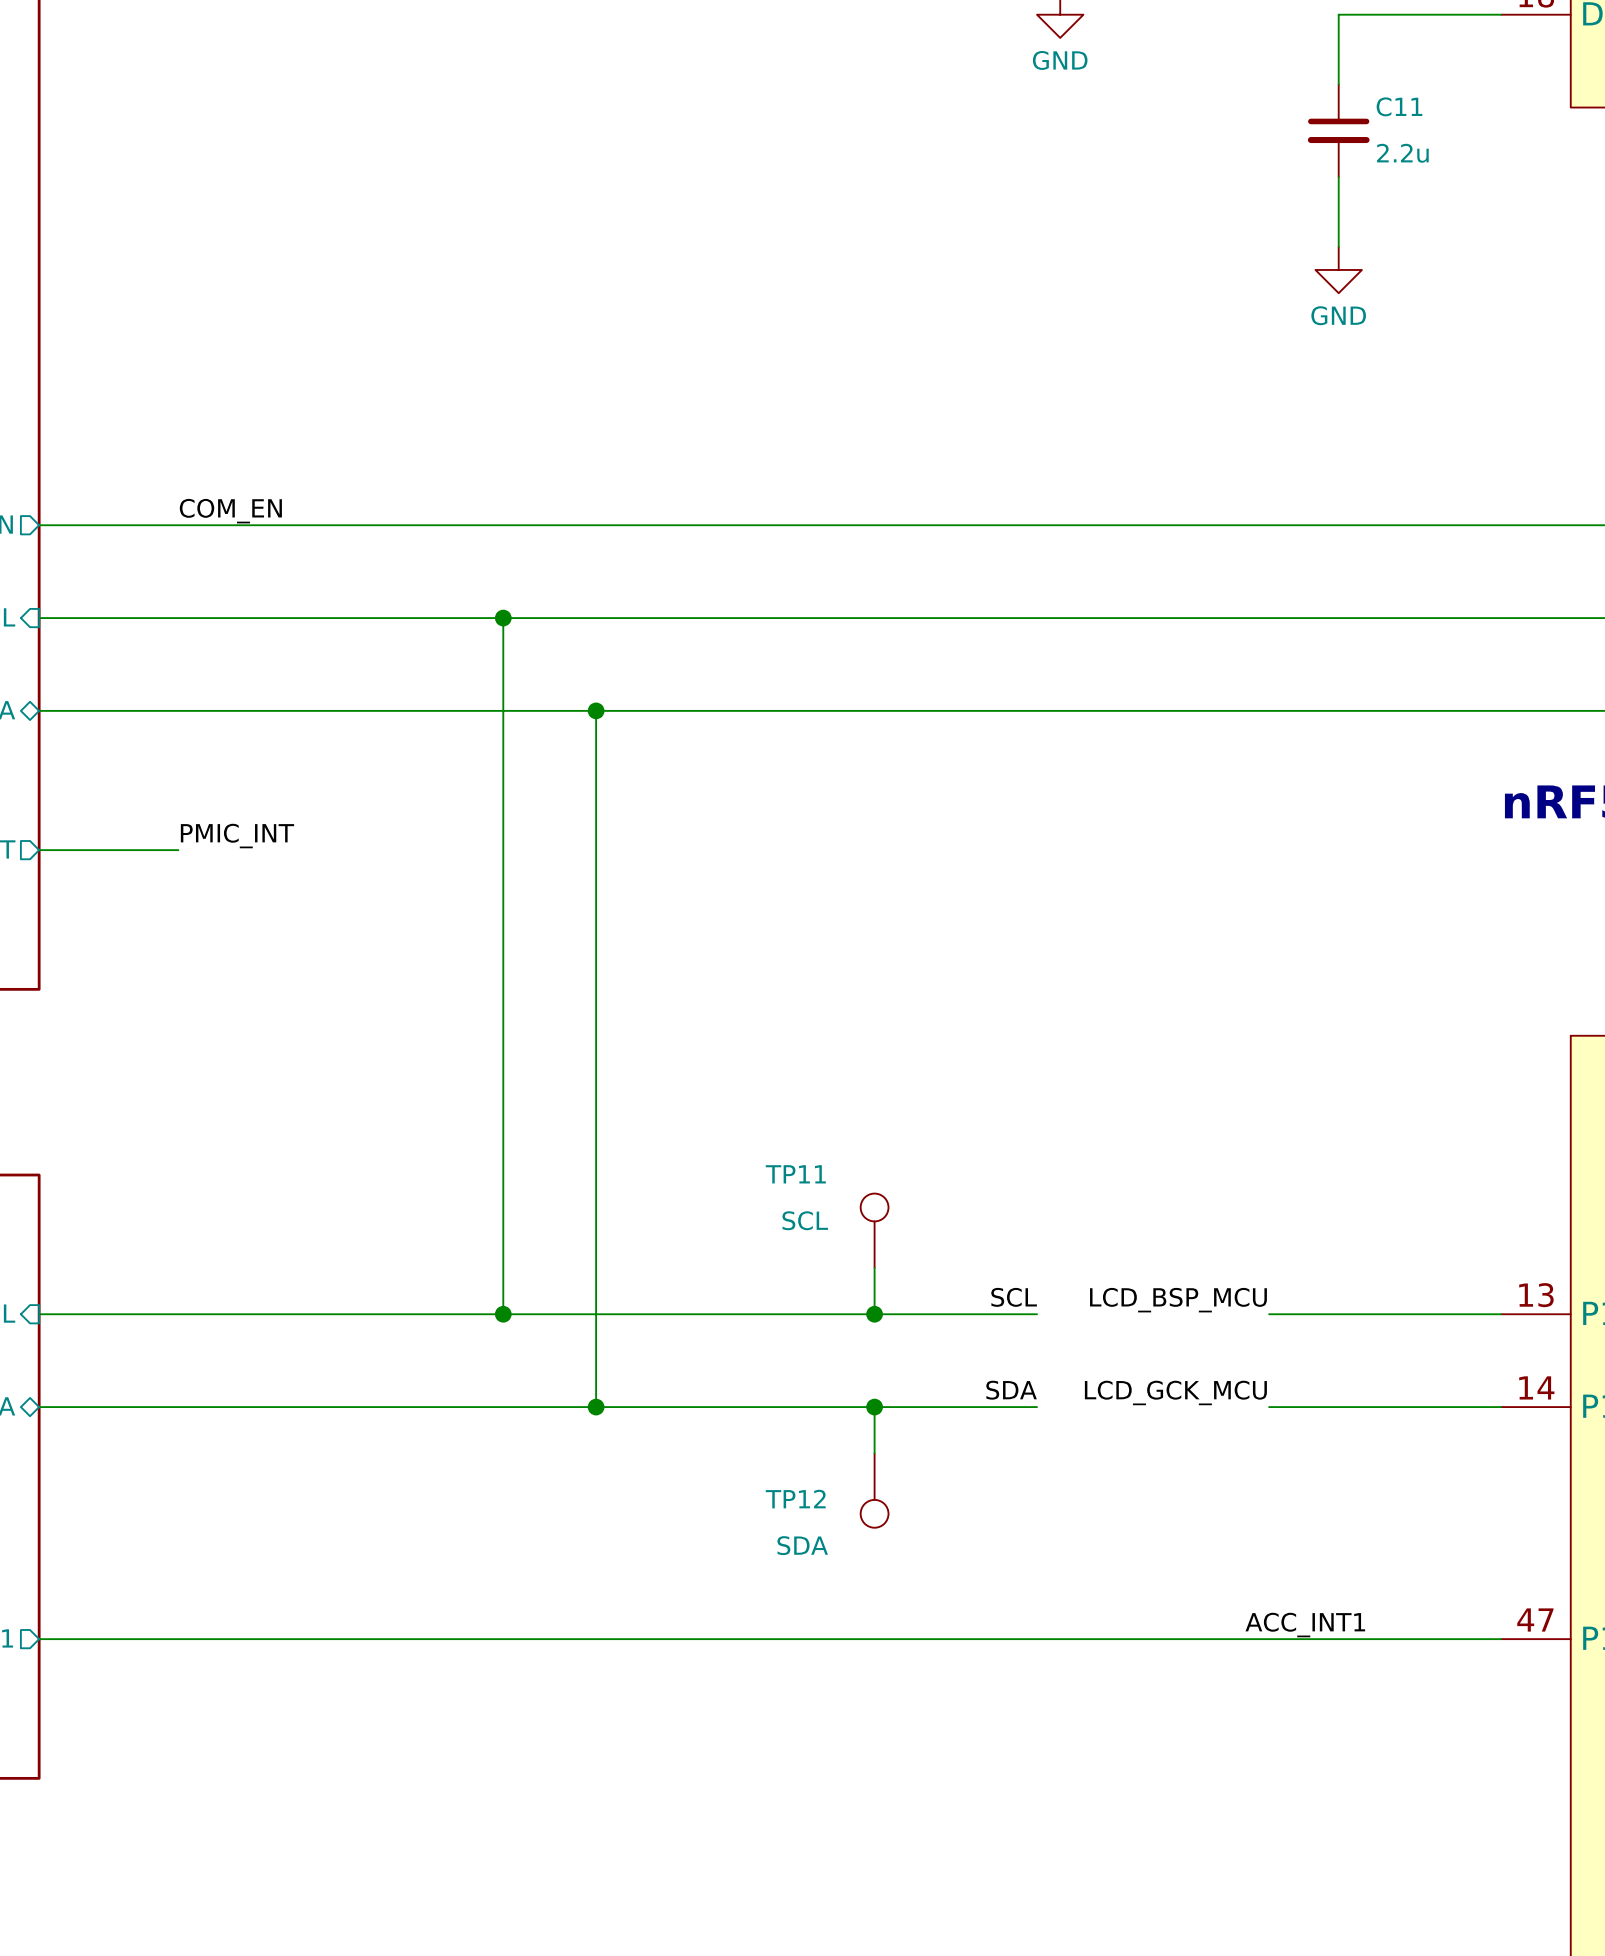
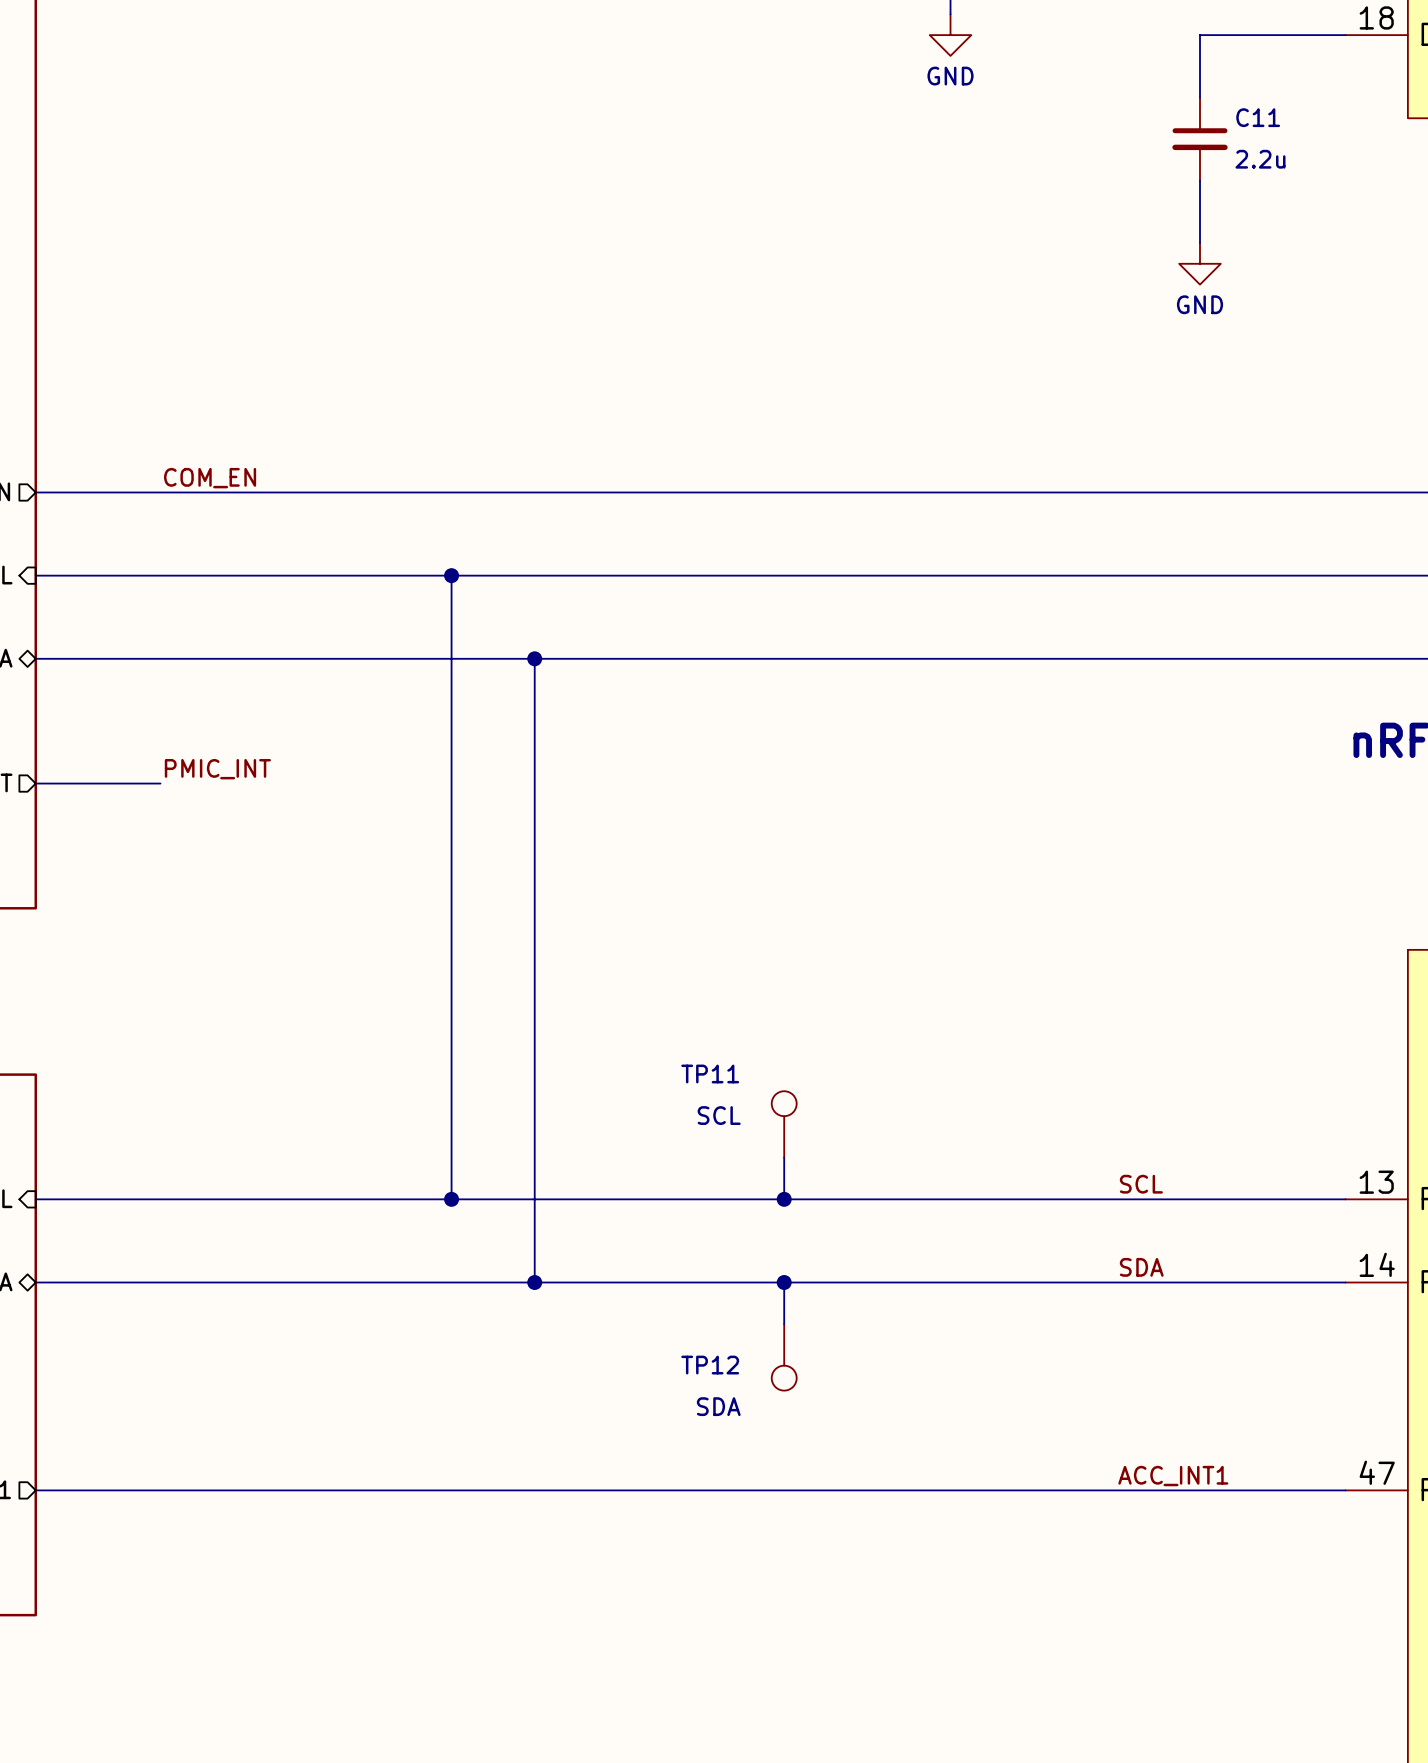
label position: SCL (1014, 1297) -> SCL (1141, 1184)
label: LCD_BSP_MCU (1178, 1300) -> none
wire: none -> (929, 1199) (1137, 1199)
label position: SDA (1011, 1390) -> SDA (1141, 1267)
label: LCD_GCK_MCU (1175, 1392) -> none
wire: none -> (929, 1282) (1137, 1282)

